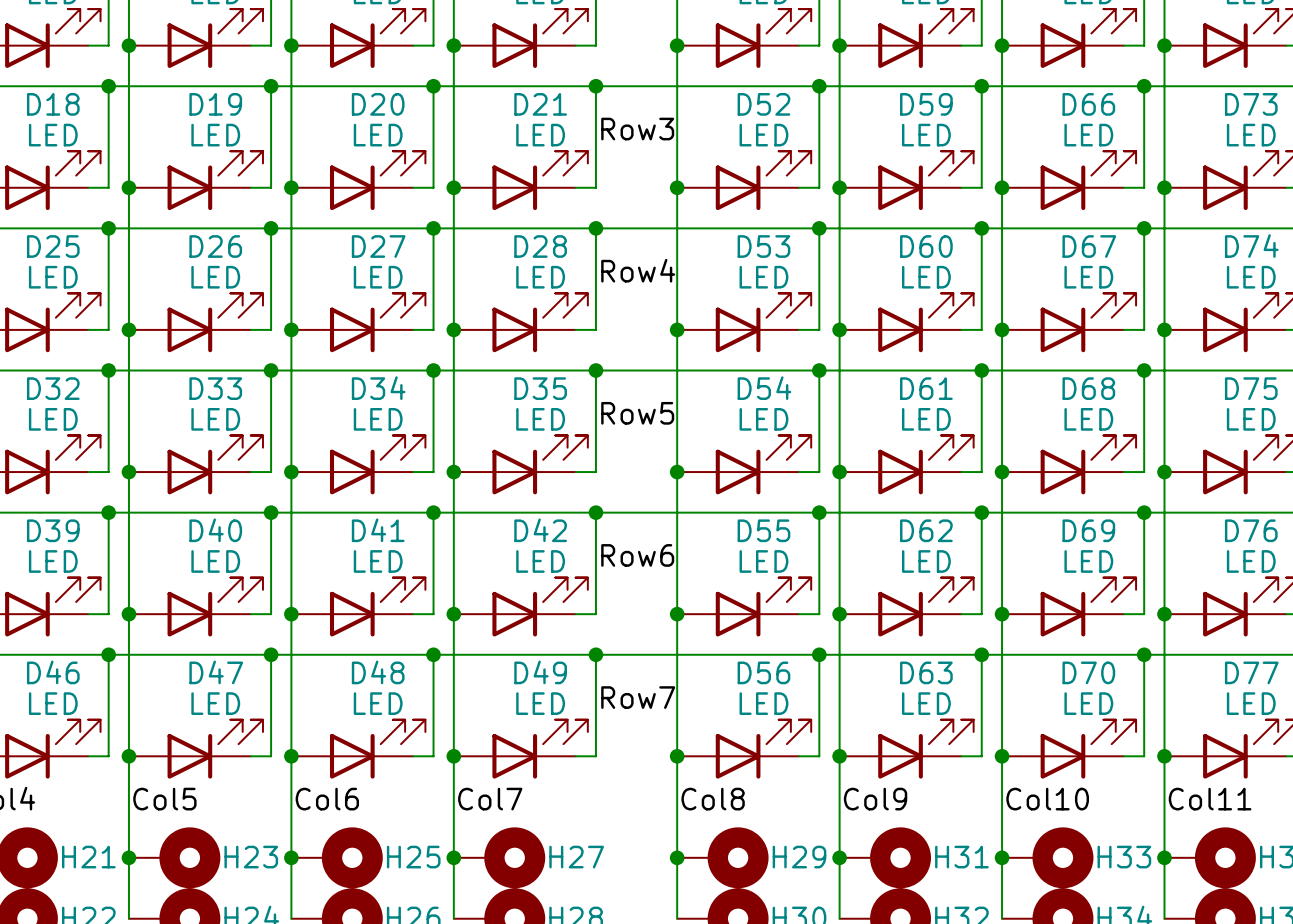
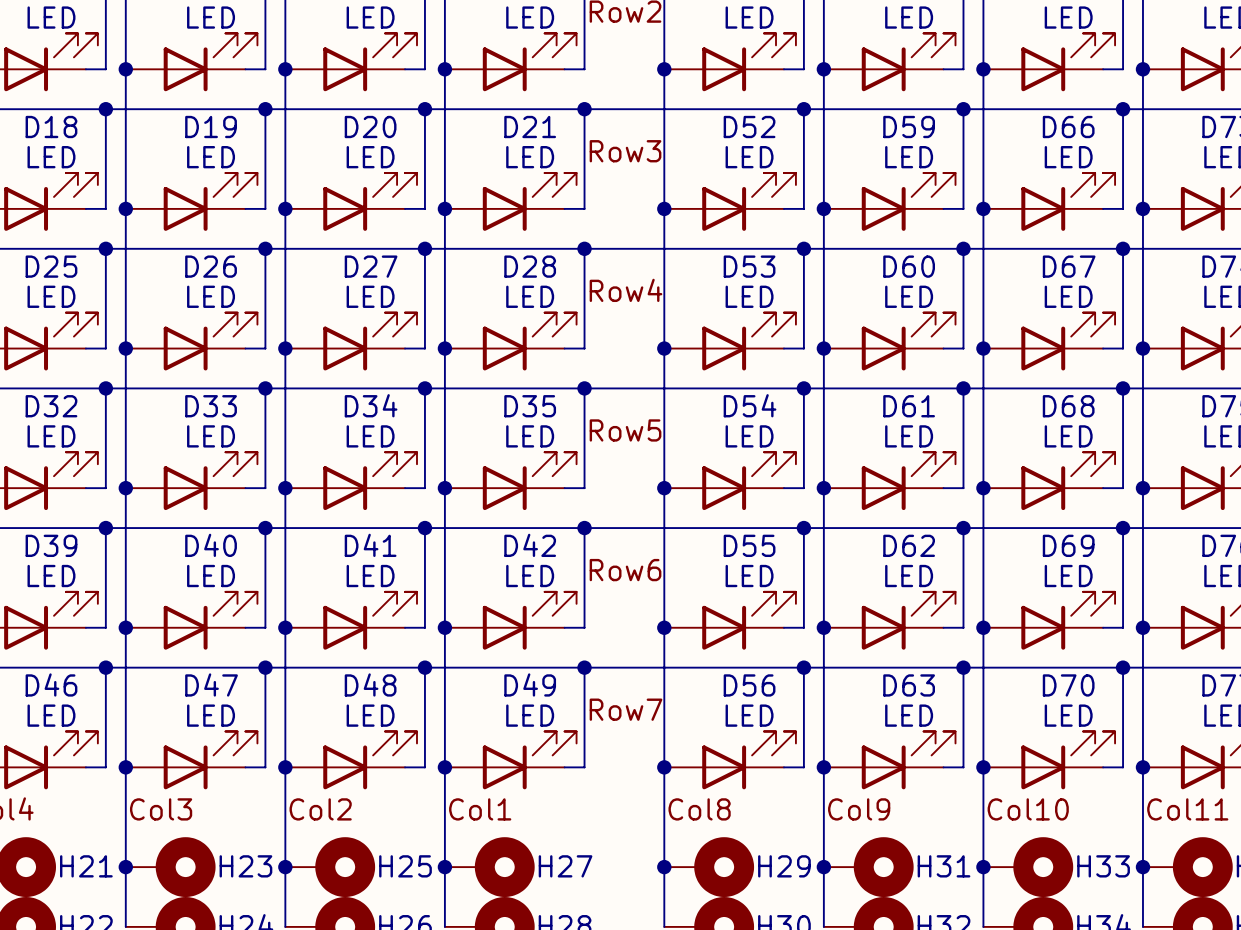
label: Col5 (164, 799) -> Col3 (161, 809)
label: Col6 (327, 799) -> Col2 (320, 809)
label: Col7 (490, 799) -> Col1 (480, 809)

